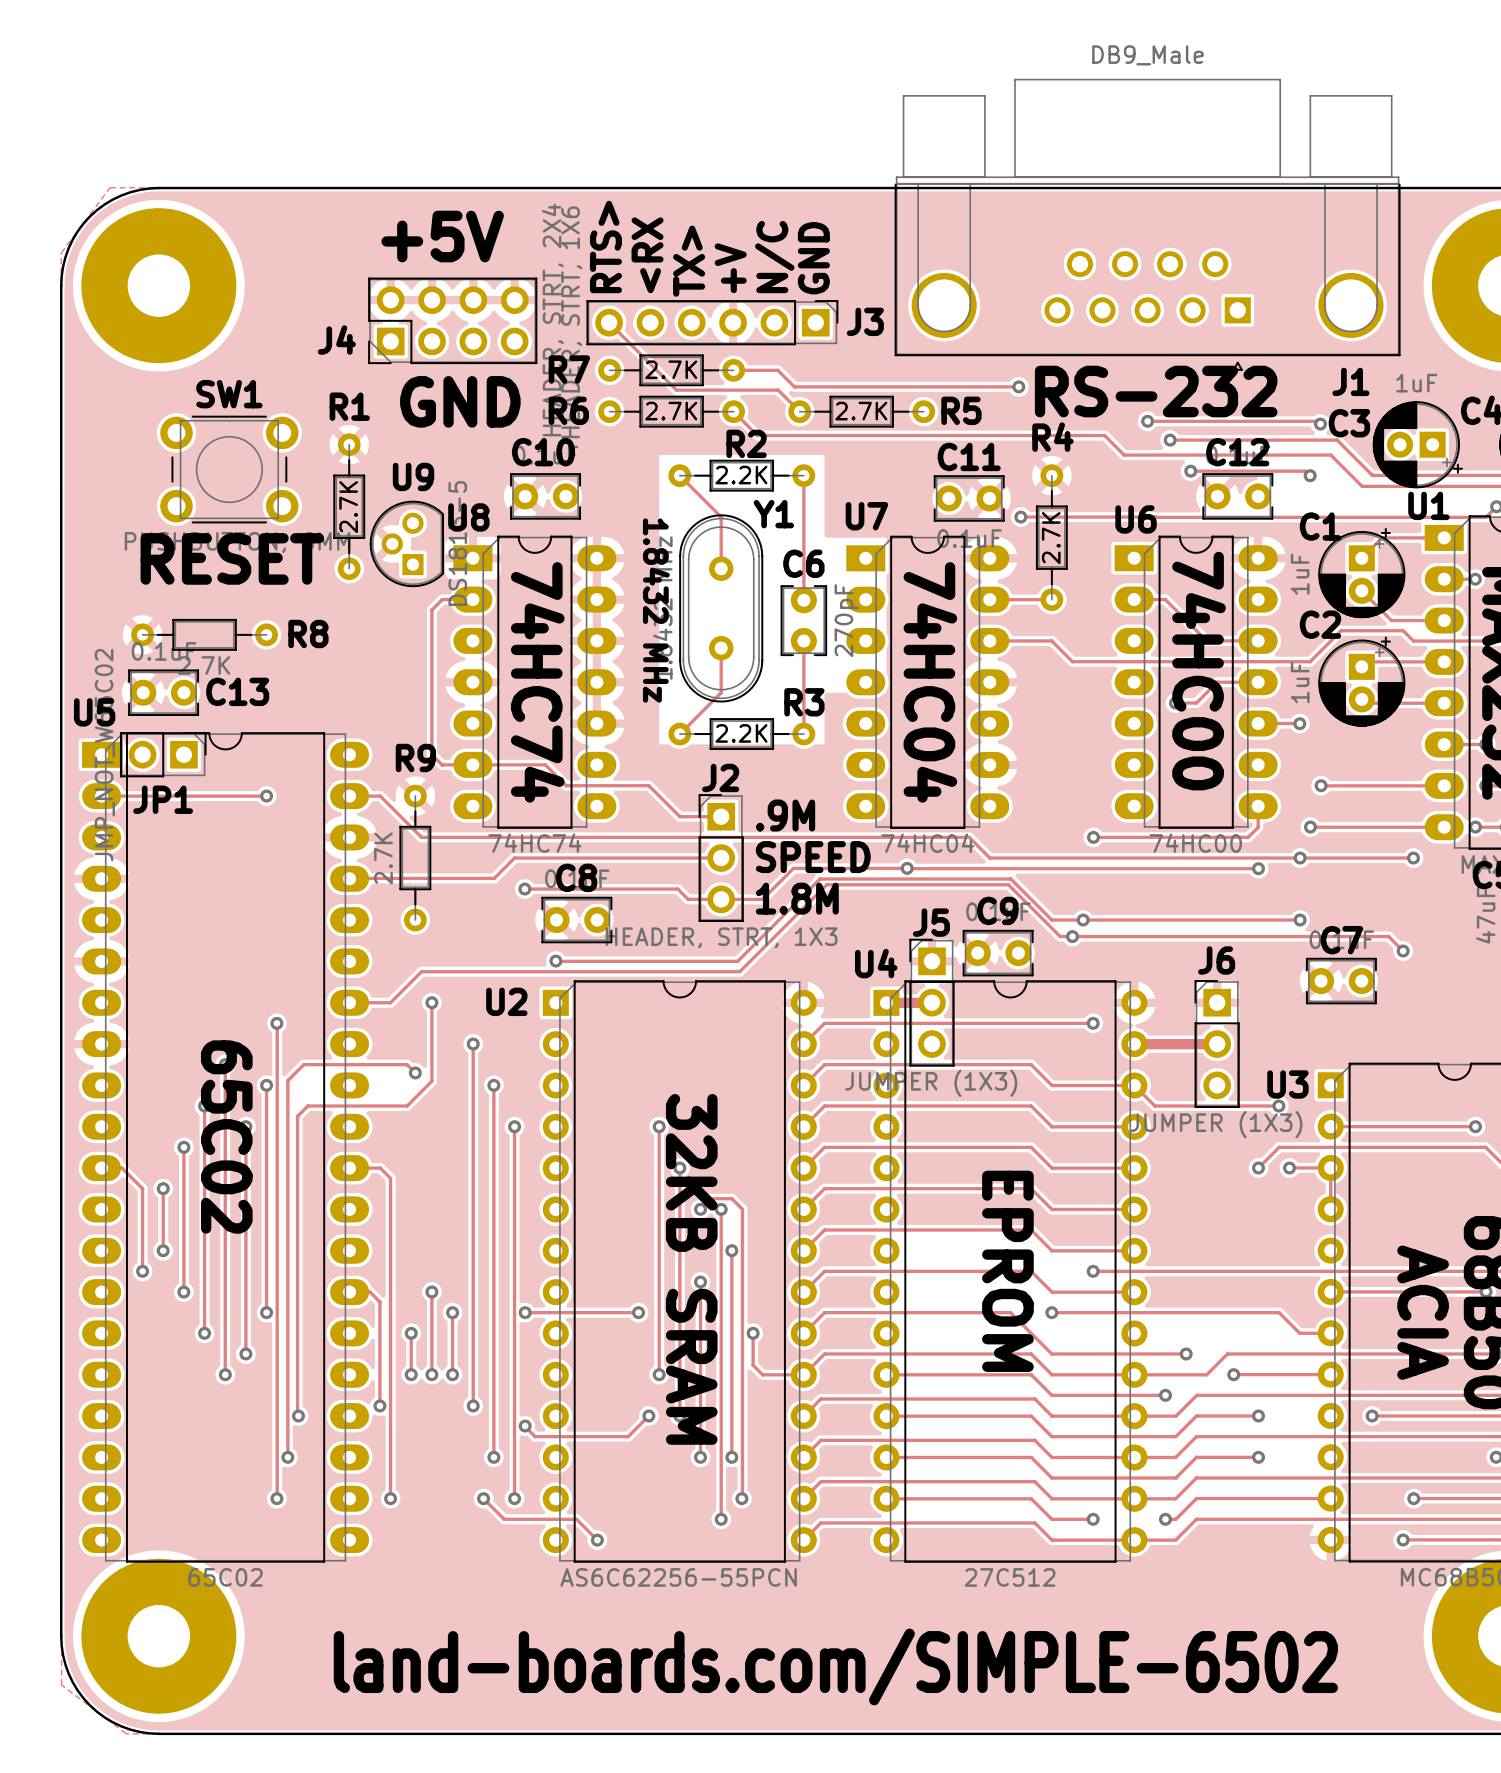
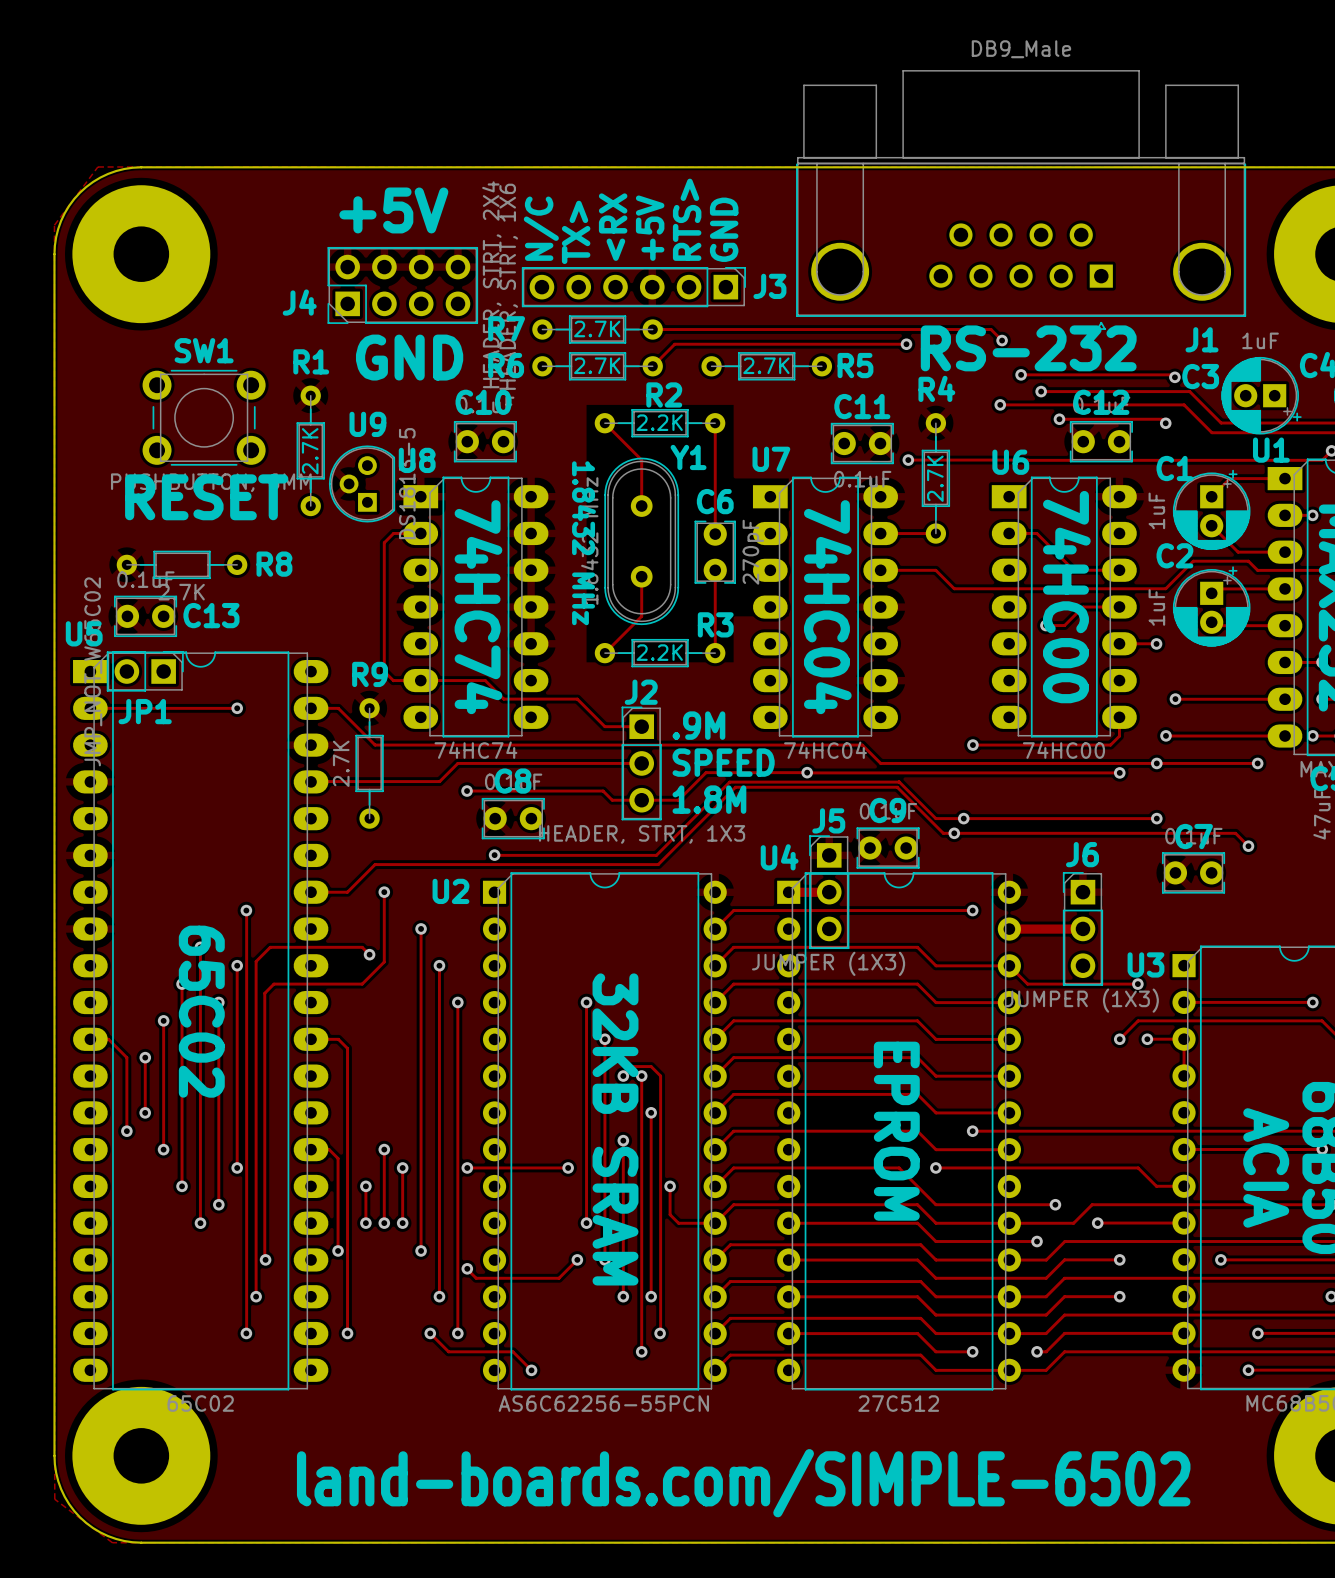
text: RTS> (605, 247) -> N/C (541, 228)
text: <RX (647, 255) -> TX> (576, 232)
text: N/C (774, 257) -> RTS> (687, 219)
text: TX> (689, 261) -> <RX (613, 227)
text: +V (730, 268) -> +5V (650, 228)
track: (609, 322) (676, 390) (778, 390) (799, 411) -> none
track: (777, 370) (794, 386) -> (652, 366) (674, 344) (706, 344)
track: none -> (692, 329) (991, 329) (1002, 340)
via: none -> (1002, 340)
track: (733, 411) (757, 435) (1104, 435) (1124, 455) -> none
via: none -> (1000, 404)

